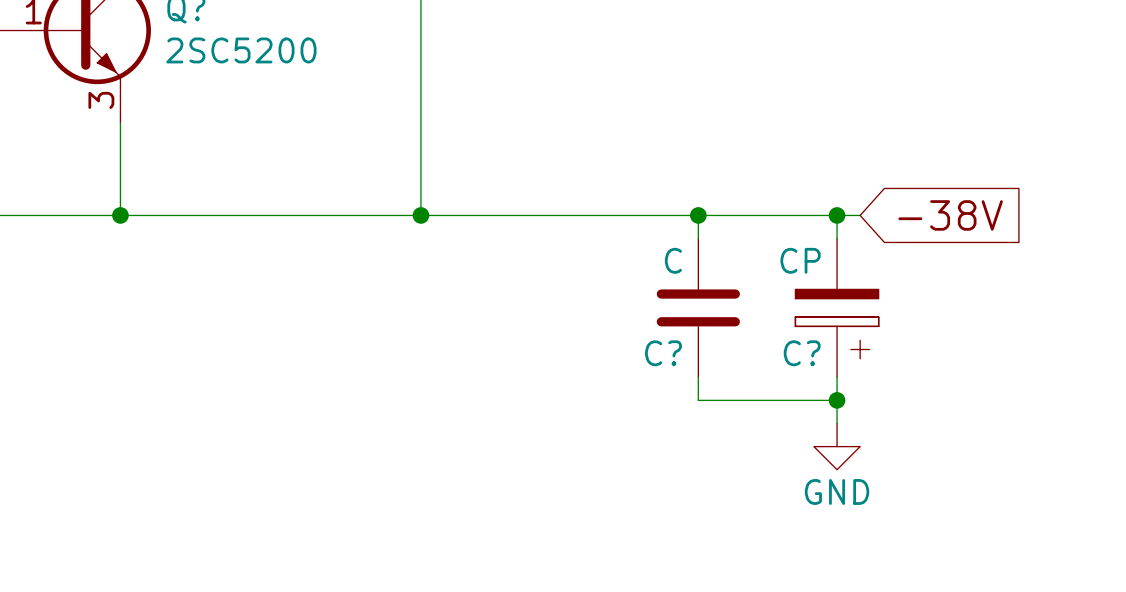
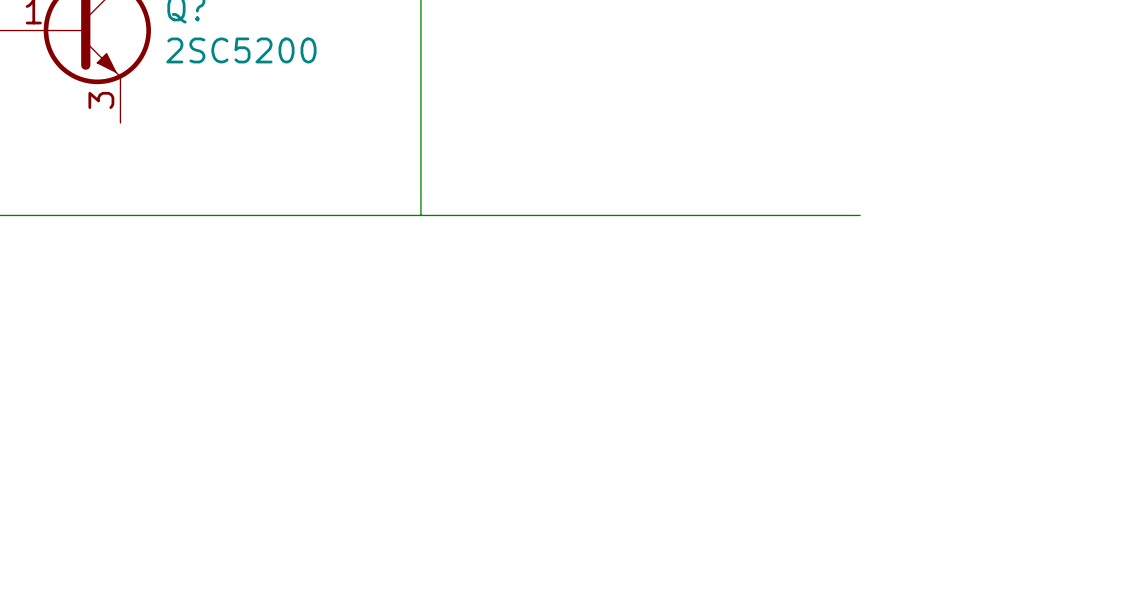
wire: (120, 122) (120, 215) -> none
junction: (120, 215) -> none
junction: (420, 215) -> none
wire: (698, 215) (698, 238) -> none
junction: (698, 215) -> none
wire: (837, 215) (837, 238) -> none
junction: (837, 215) -> none
global label: -38V (950, 215) -> none
C?: C (698, 307) -> none
C?: CP (837, 307) -> none
wire: (698, 377) (698, 400) (837, 400) -> none
wire: (837, 377) (837, 423) -> none
junction: (837, 400) -> none
power symbol: GND (837, 446) -> none

